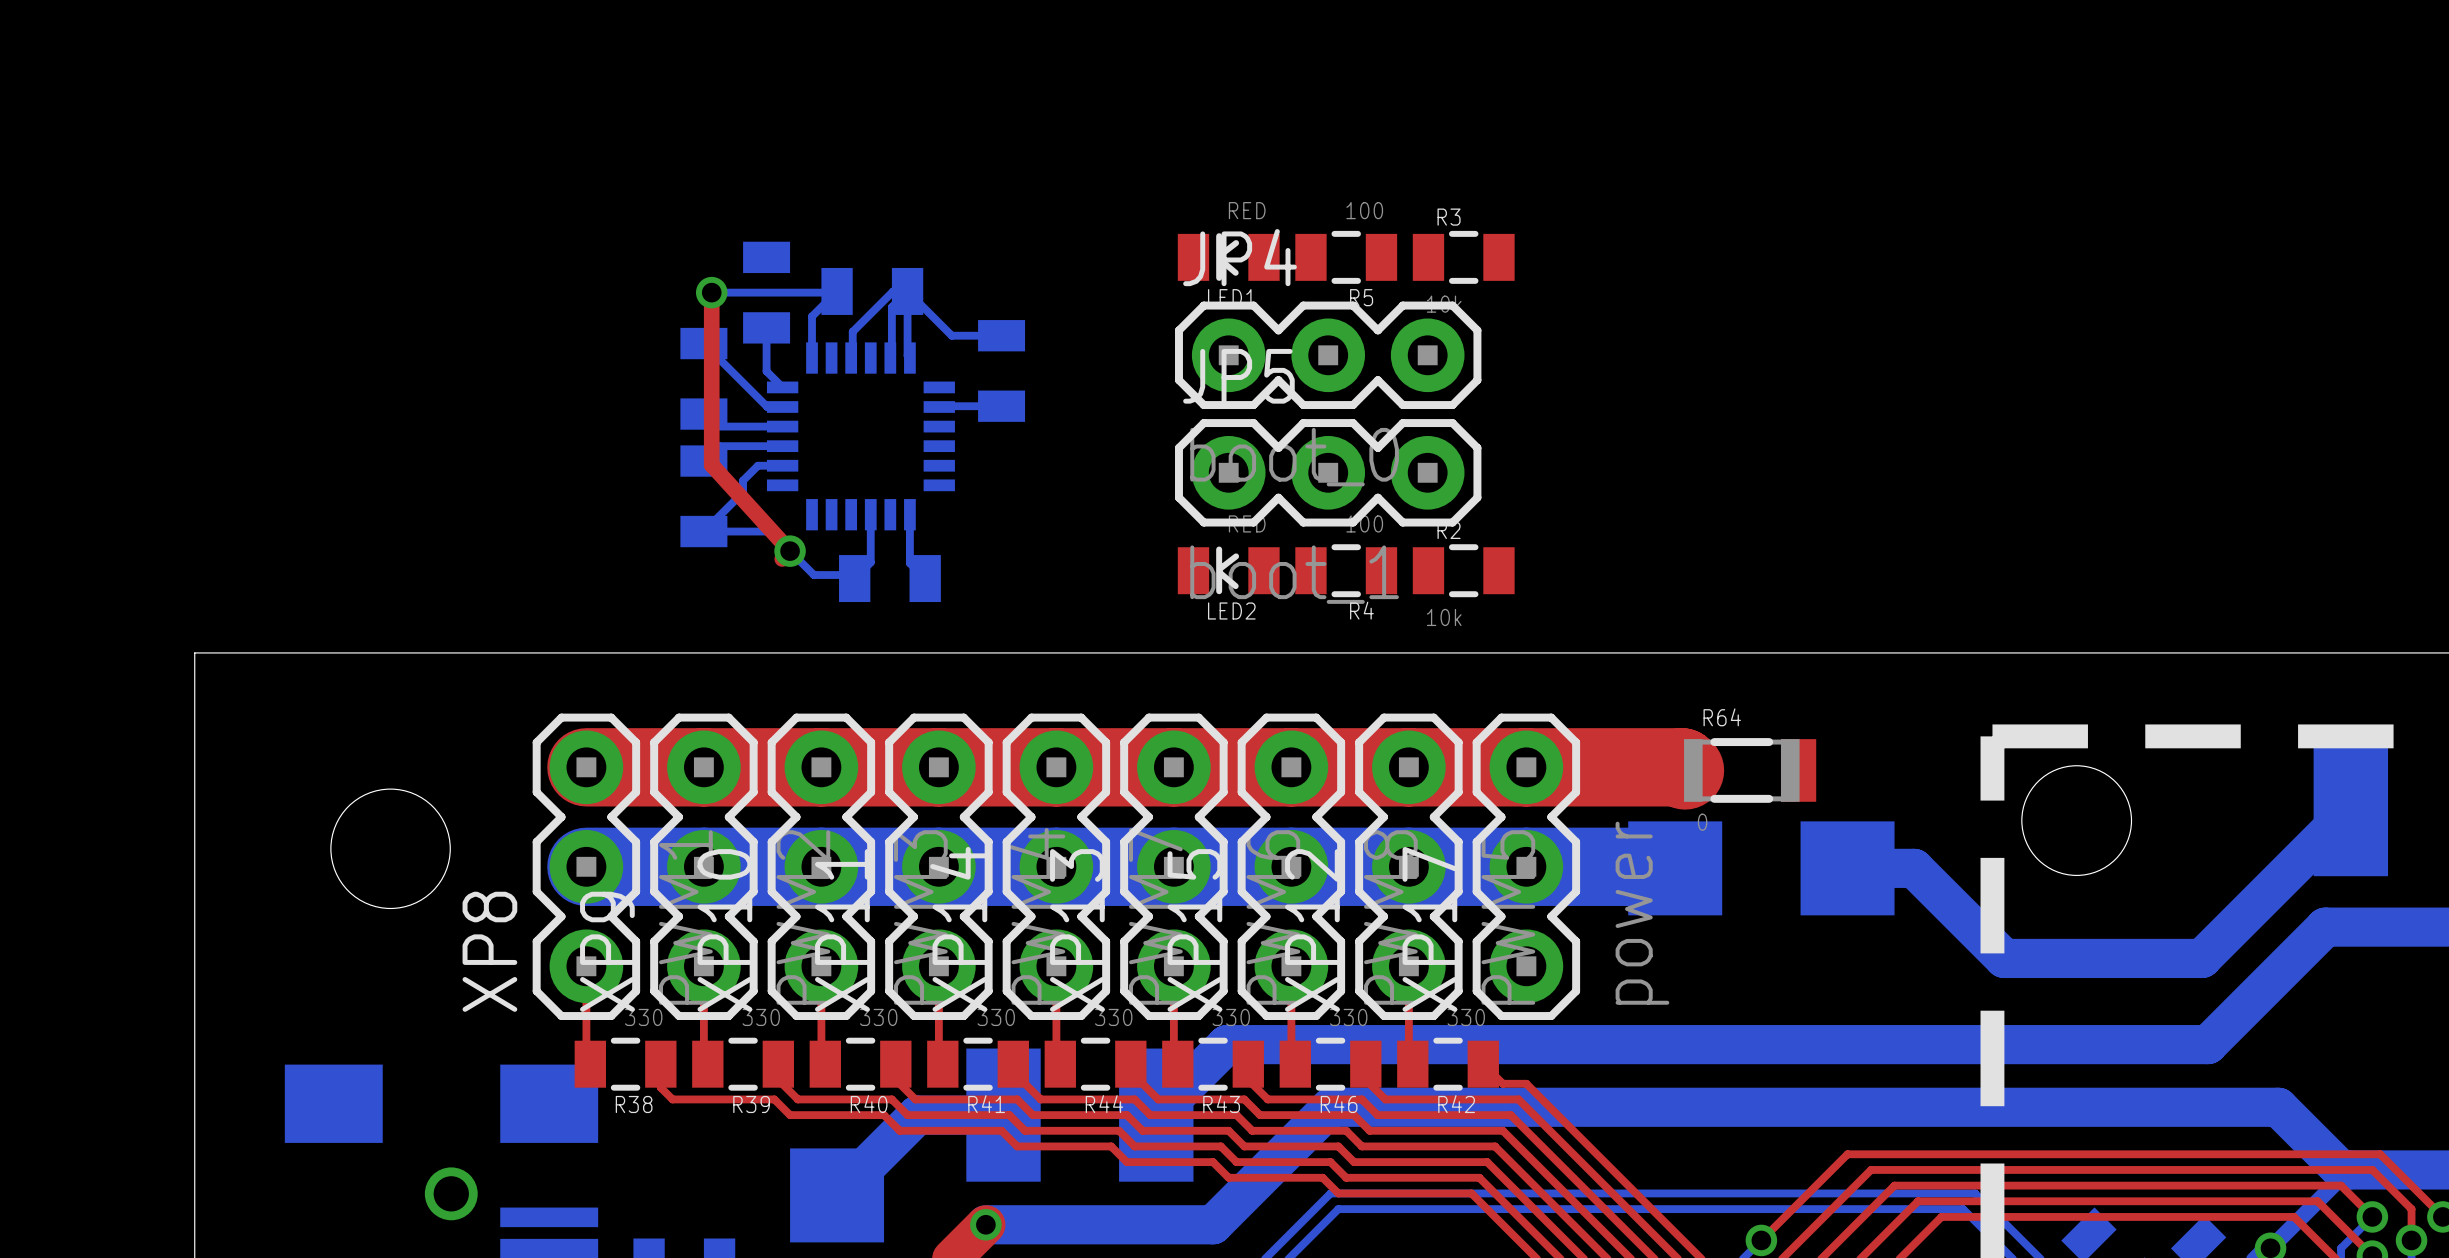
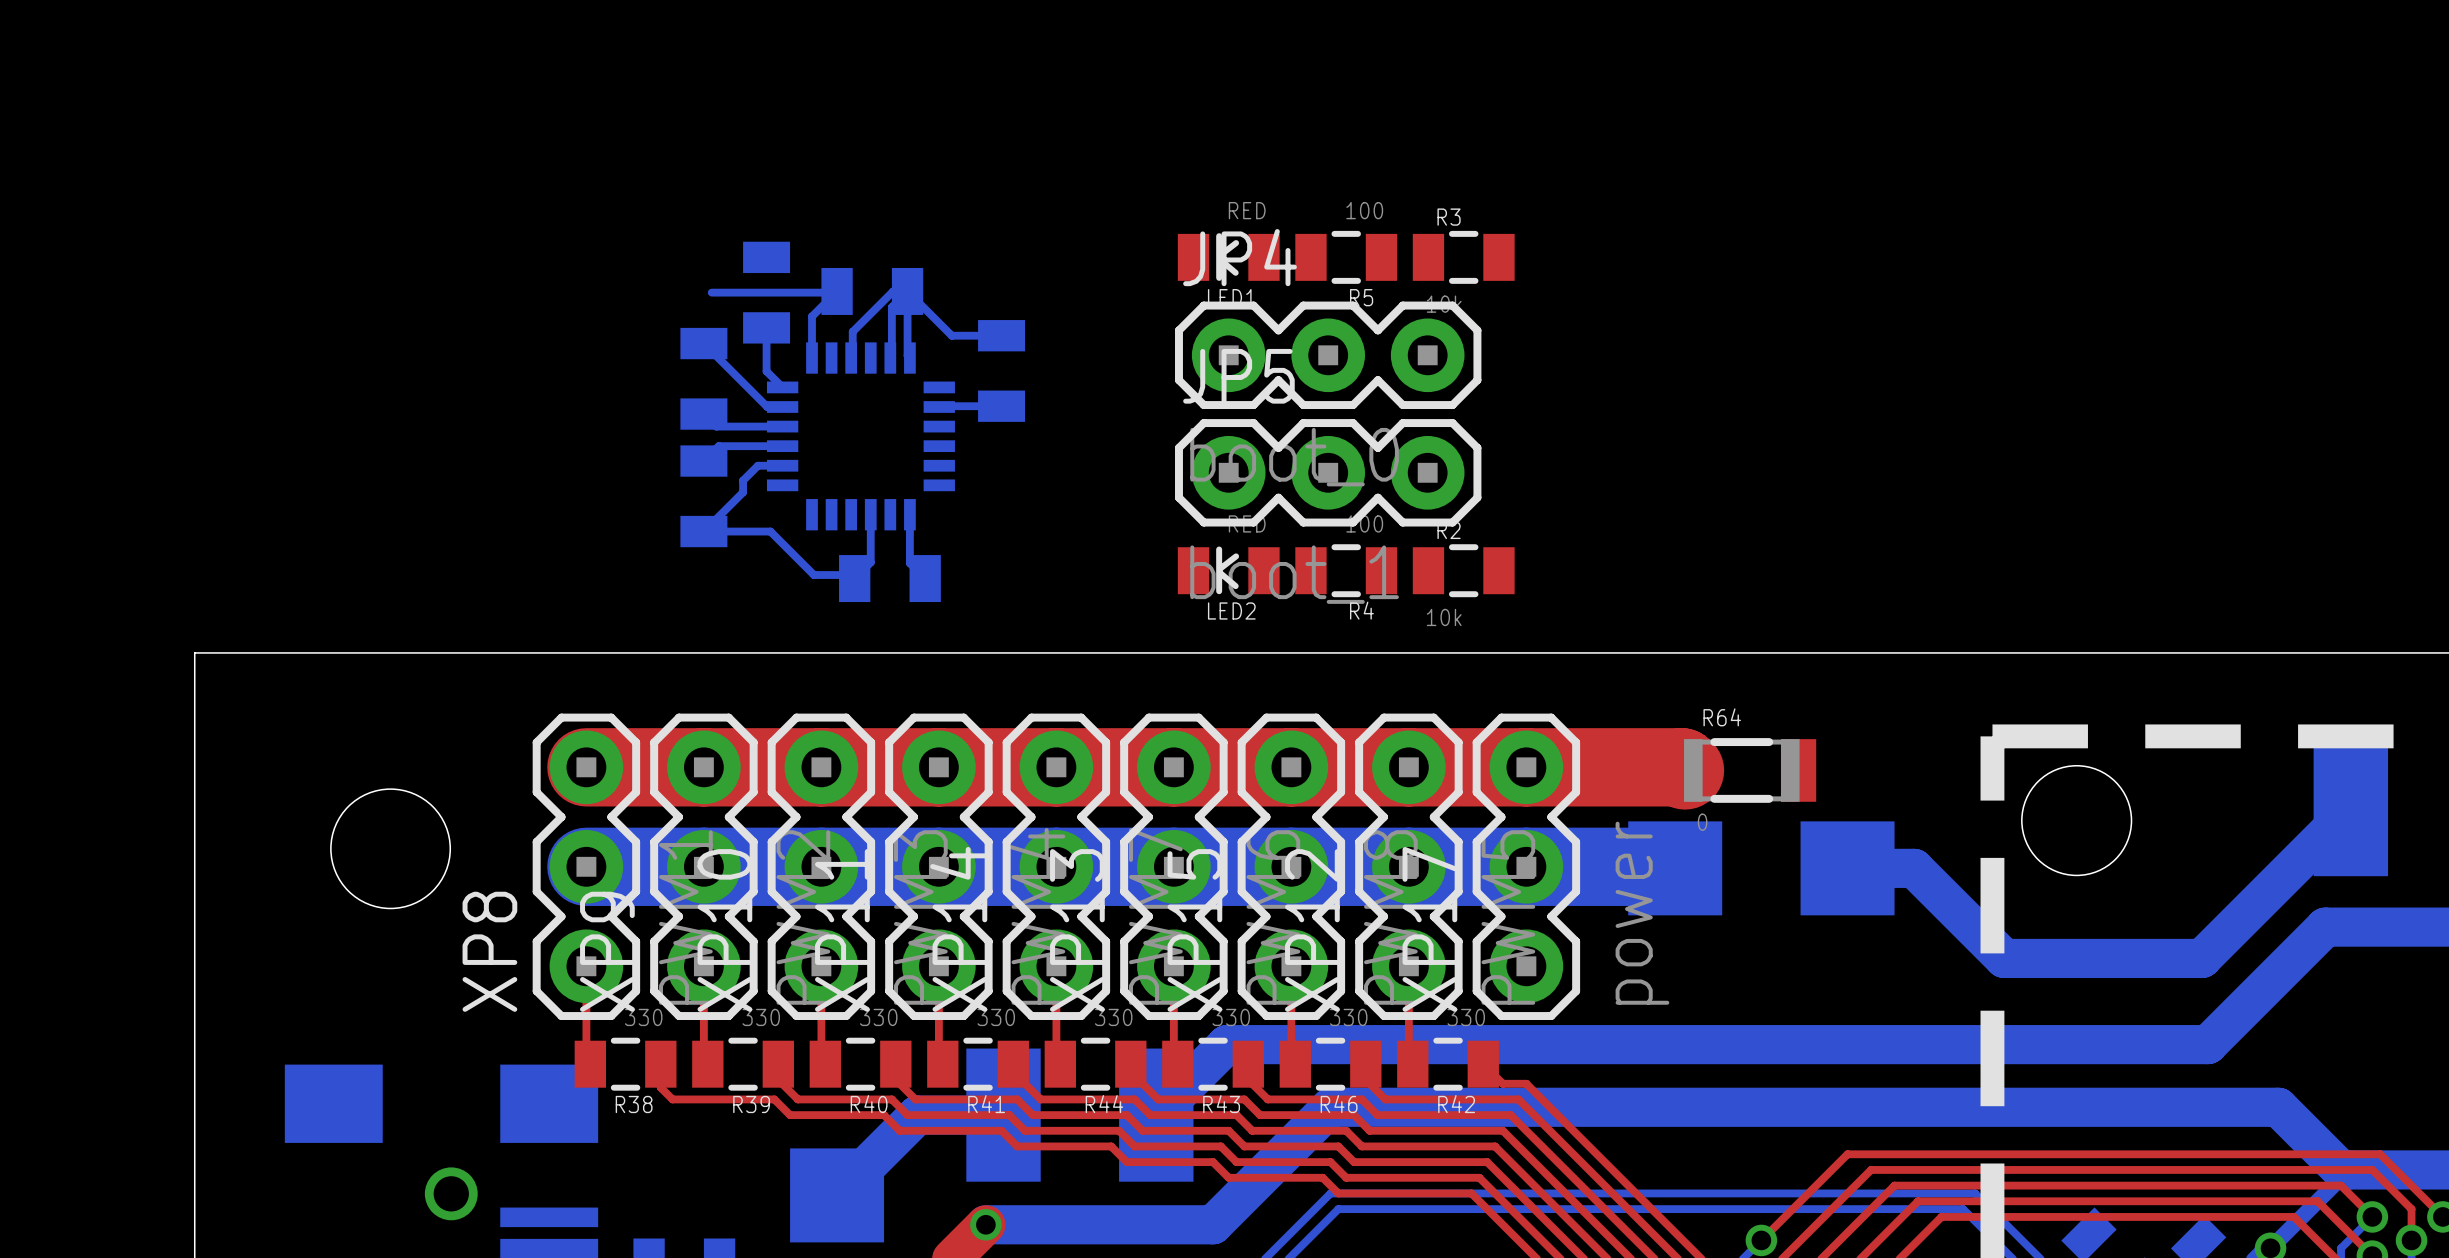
top track: (711, 292) (711, 464) (790, 551) (782, 558) -> none
via: (711, 292) -> none
via: (790, 551) -> none

